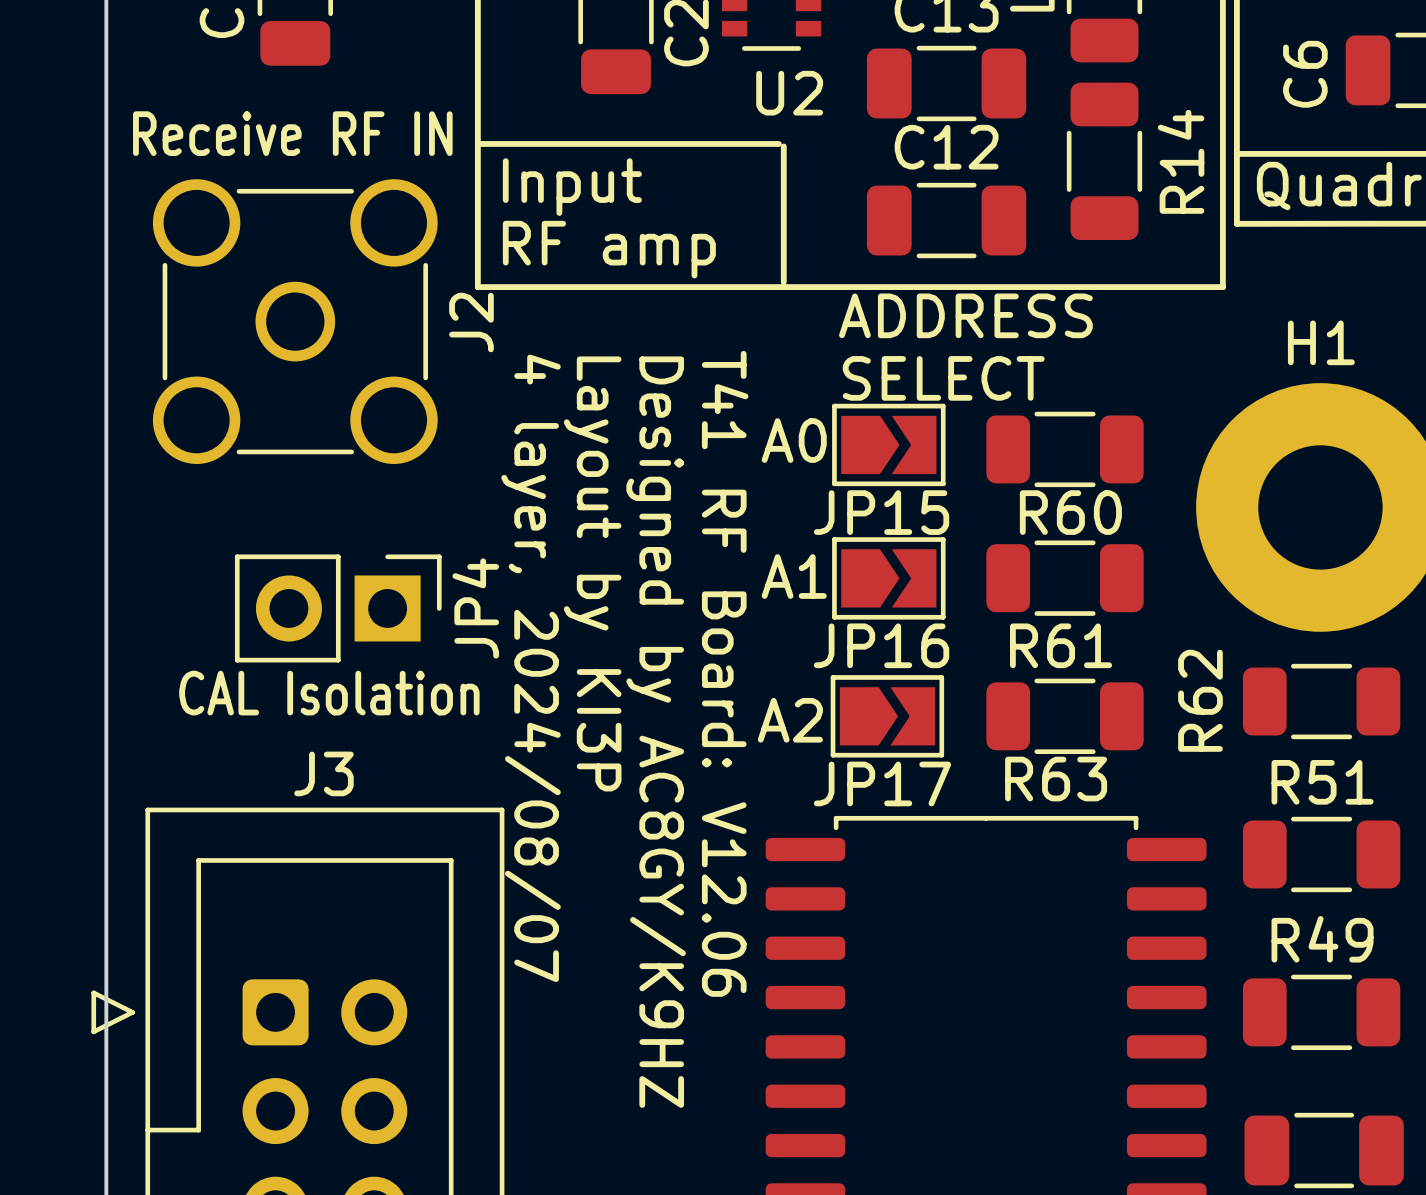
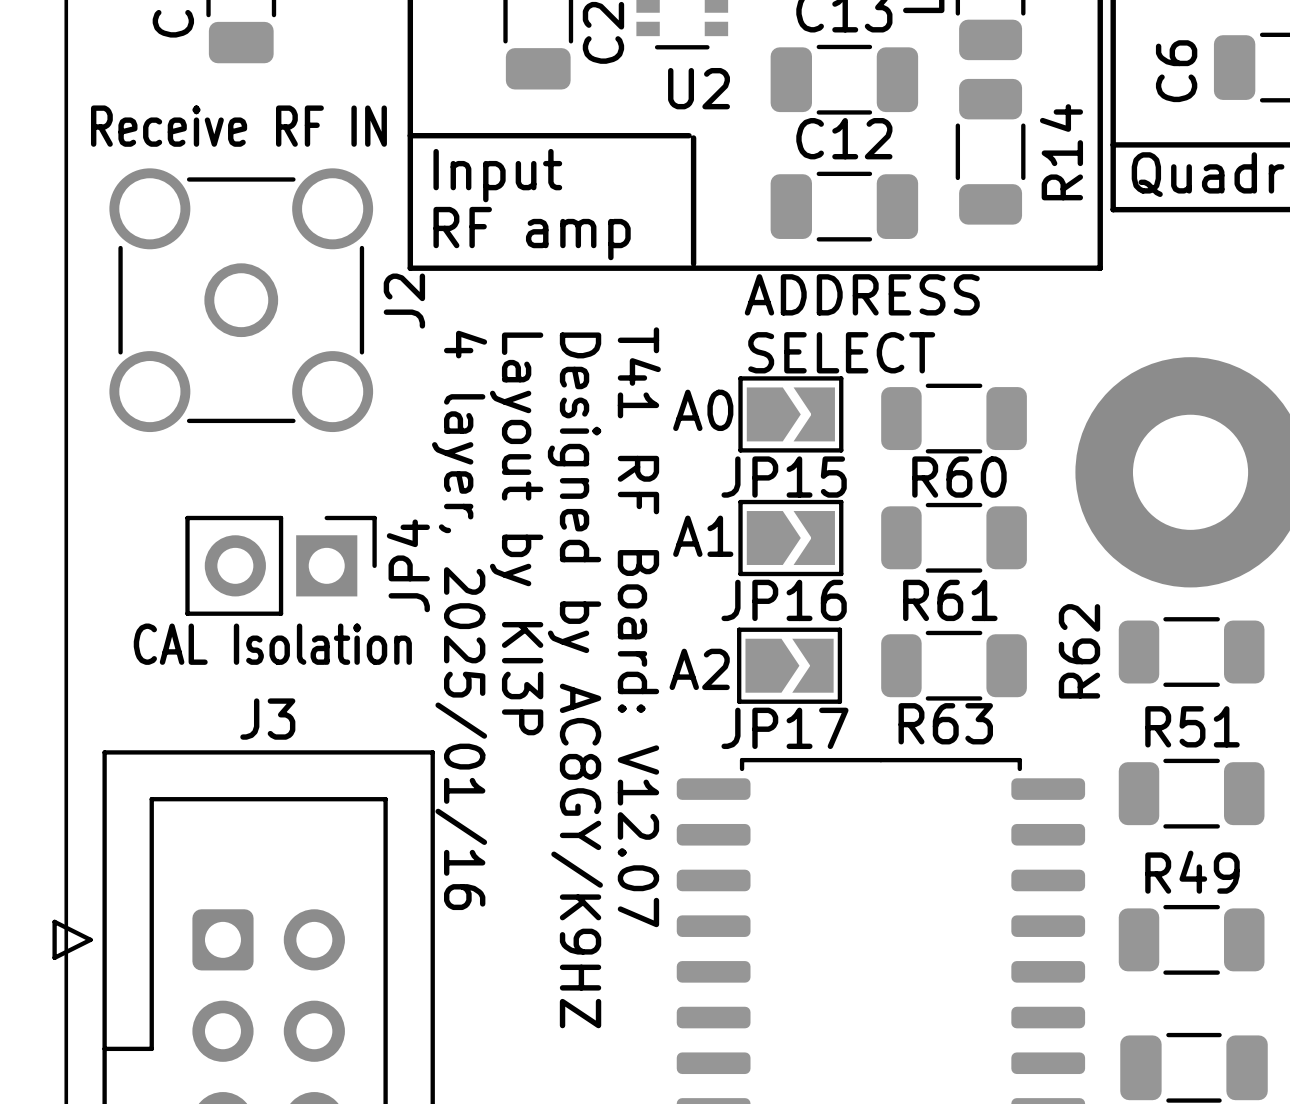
H1 name: H1 (1321, 342) -> none
text: 4 layer, 2024/08/07 (531, 668) -> 4 layer, 2025/01/16 (459, 620)
text: T41 RF Board: V12.06 (725, 673) -> T41 RF Board: V12.07 (639, 627)

